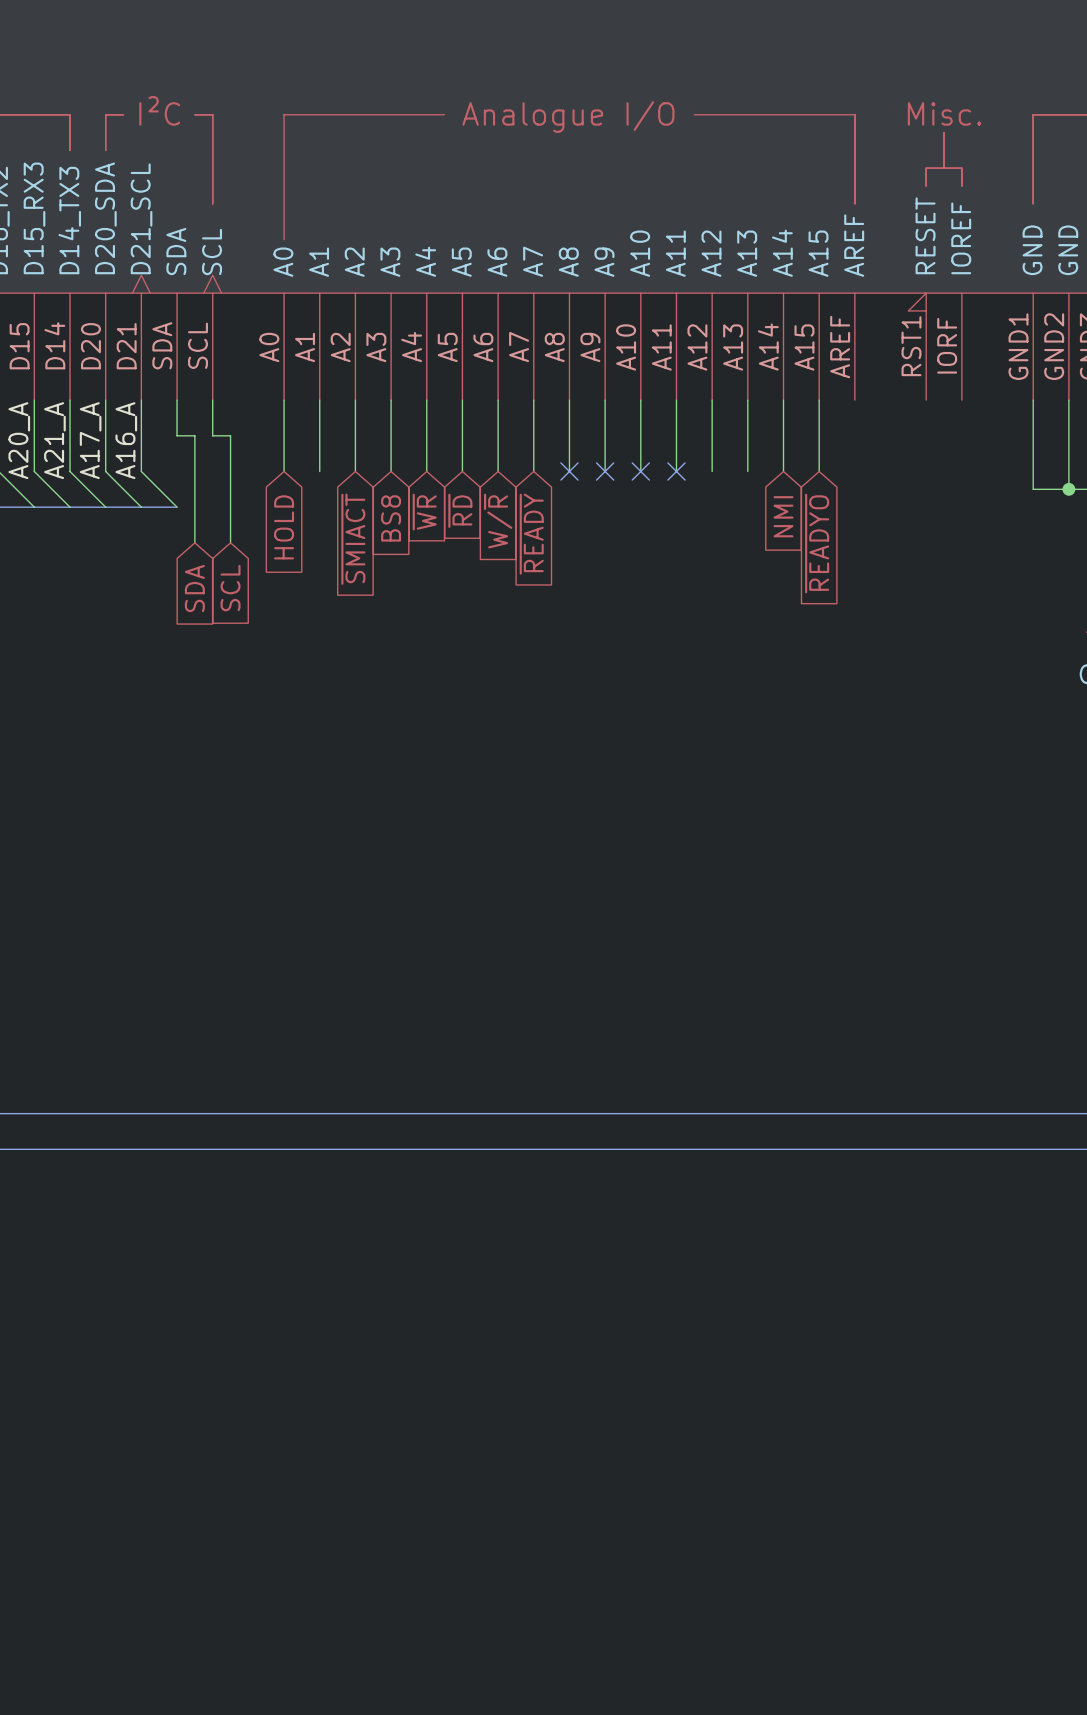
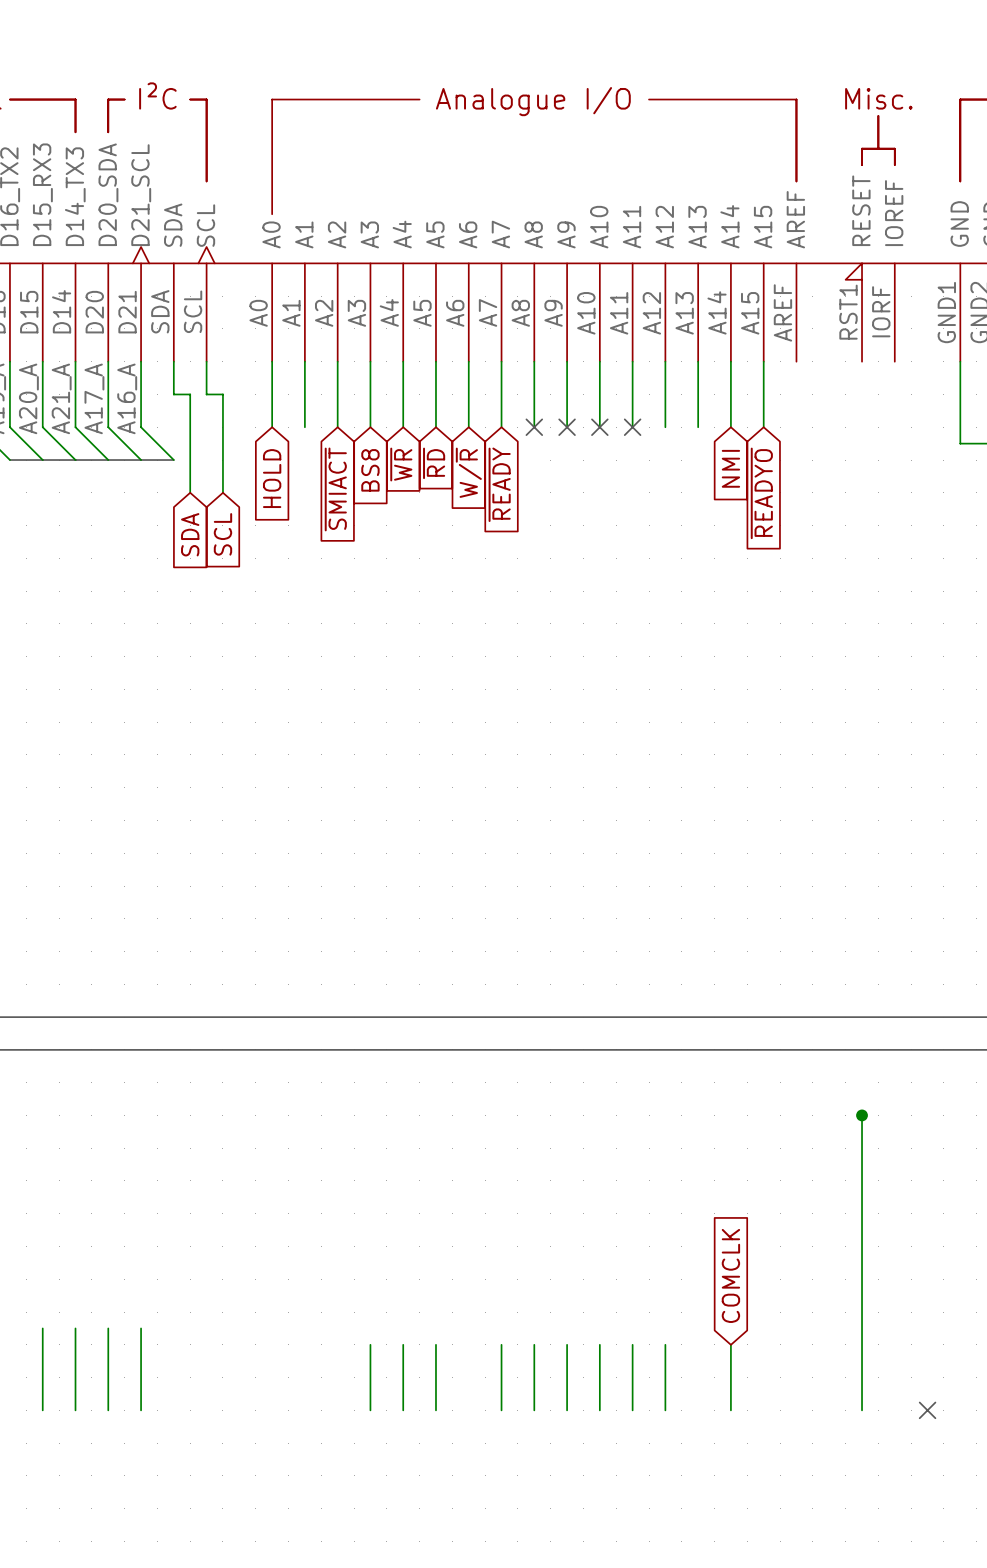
wire: none -> (862, 1115) (862, 1410)
junction: none -> (862, 1115)
global label: none -> COMCLK (730, 1275)
wire: none -> (42, 1328) (42, 1410)
wire: none -> (75, 1328) (75, 1410)
wire: none -> (108, 1328) (108, 1410)
wire: none -> (141, 1328) (141, 1410)
wire: none -> (370, 1344) (370, 1410)
wire: none -> (403, 1344) (403, 1410)
wire: none -> (435, 1344) (435, 1410)
wire: none -> (501, 1344) (501, 1410)
wire: none -> (534, 1344) (534, 1410)
wire: none -> (567, 1344) (567, 1410)
wire: none -> (599, 1344) (599, 1410)
wire: none -> (632, 1344) (632, 1410)
wire: none -> (665, 1344) (665, 1410)
wire: none -> (730, 1344) (730, 1410)
no-connect mark: none -> (927, 1410)

